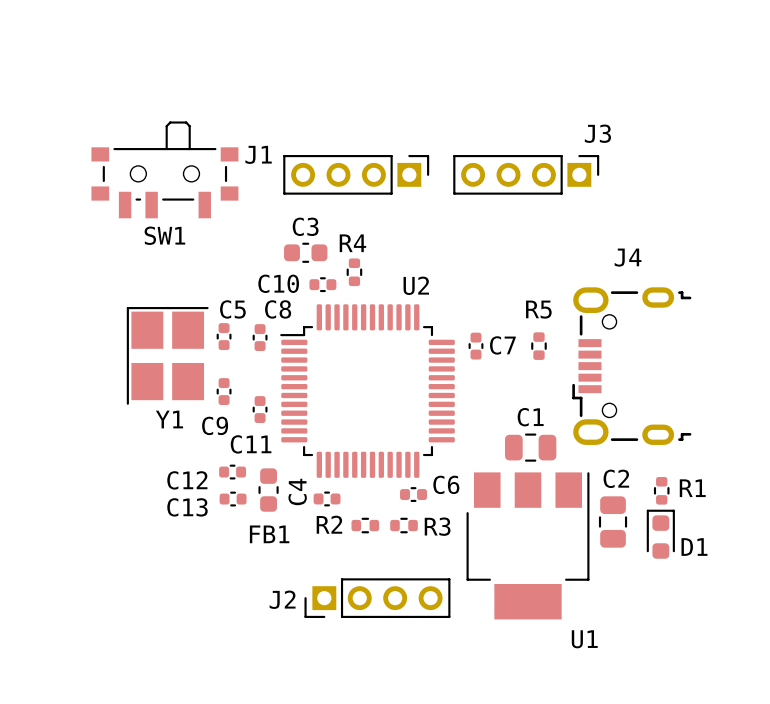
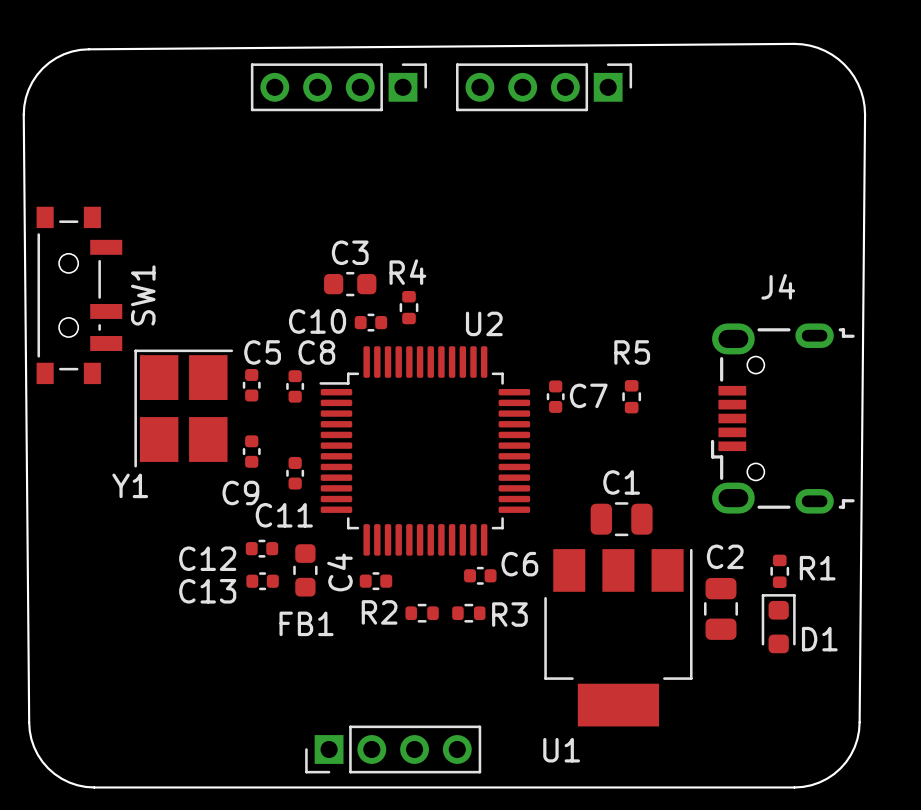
board edge: none -> (794, 43) (88, 49) (63, 54) (42, 68) (28, 89) (23, 114) (29, 722) (34, 747) (48, 768) (69, 782) (94, 787) (794, 787) (819, 782) (840, 768) (854, 747) (859, 722) (864, 106) (858, 83) (844, 64) (832, 54) (817, 47) (794, 43)
part: none -> (338, 87)
part: none -> (544, 87)
SW1 footprint: [91, 121, 239, 219] -> [36, 206, 123, 385]
J1: (356, 174) -> none
J3: (526, 174) -> none
SW1 name position: SW1 (164, 235) -> SW1 (143, 295)
J4 position: (631, 366) -> (782, 418)
Y1 name position: Y1 (169, 419) -> Y1 (130, 485)
J2: (377, 598) -> none
part: none -> (393, 749)
U1 name position: U1 (584, 639) -> U1 (561, 750)

